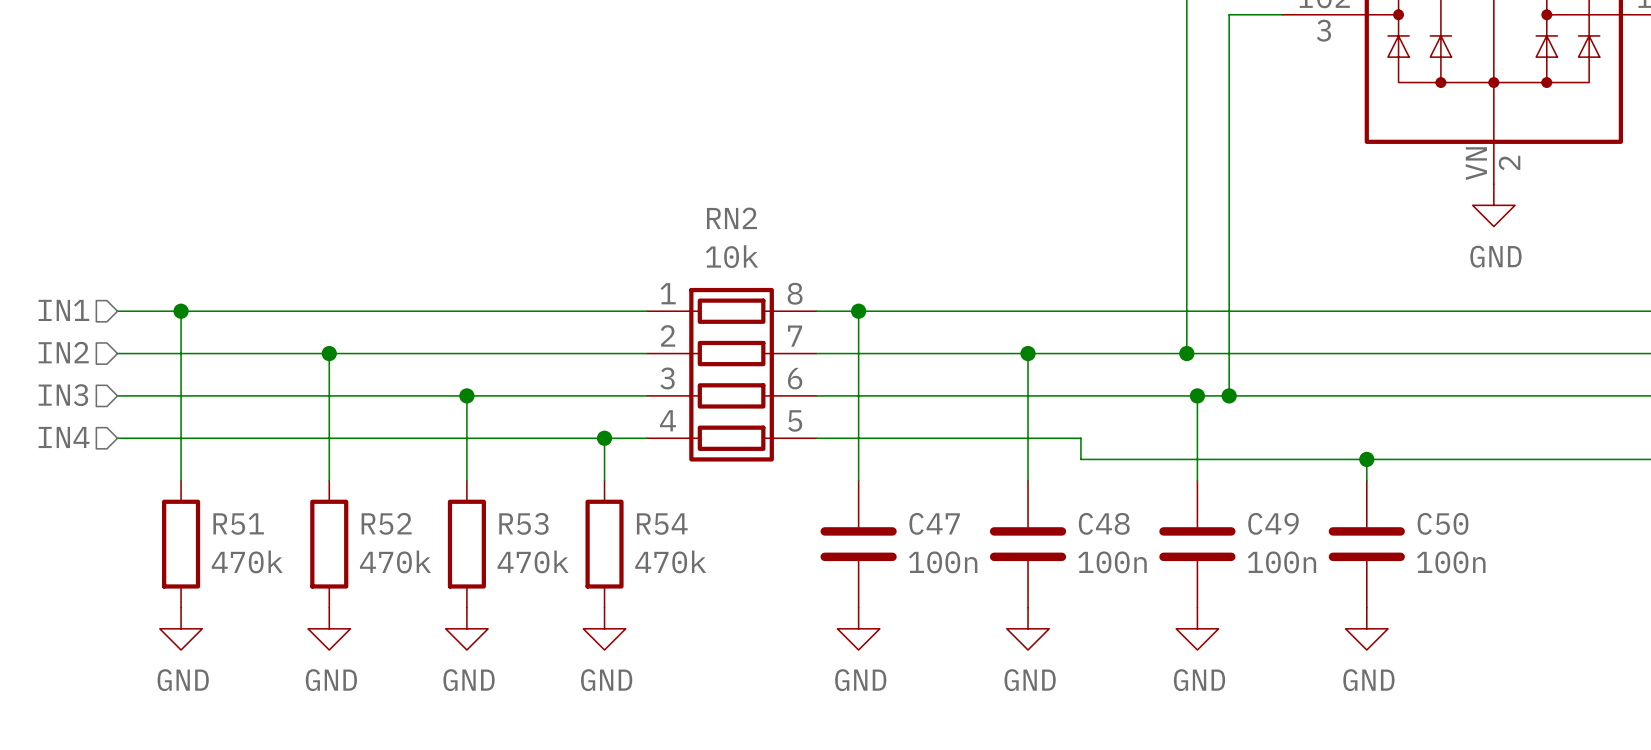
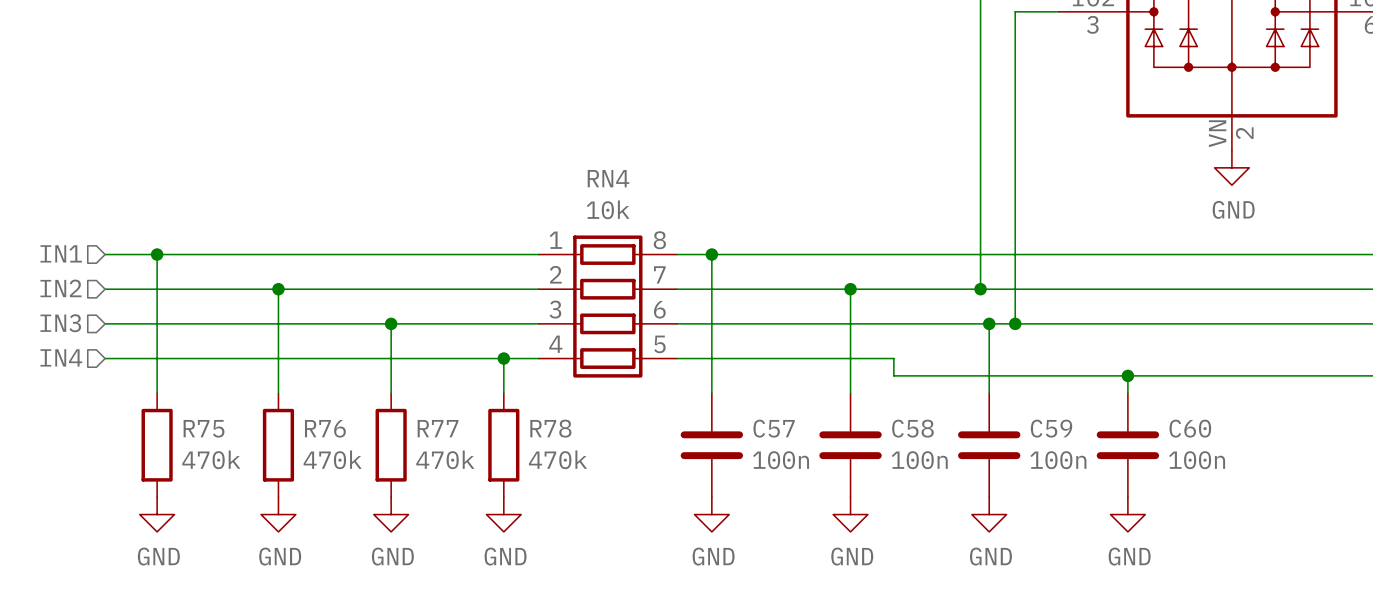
RN2 name: RN2 (731, 218) -> RN4 (608, 178)
R52 name: R52 (386, 523) -> R76 (325, 428)
R53 name: R53 (523, 523) -> R77 (438, 428)
C47 name: C47 (934, 523) -> C57 (774, 428)
C48 name: C48 (1104, 523) -> C58 (912, 428)
C49 name: C49 (1273, 523) -> C59 (1051, 428)
C50 name: C50 (1443, 523) -> C60 (1190, 428)
R51 name: R51 (238, 524) -> R75 (204, 428)
R54 name: R54 (662, 524) -> R78 (550, 428)

